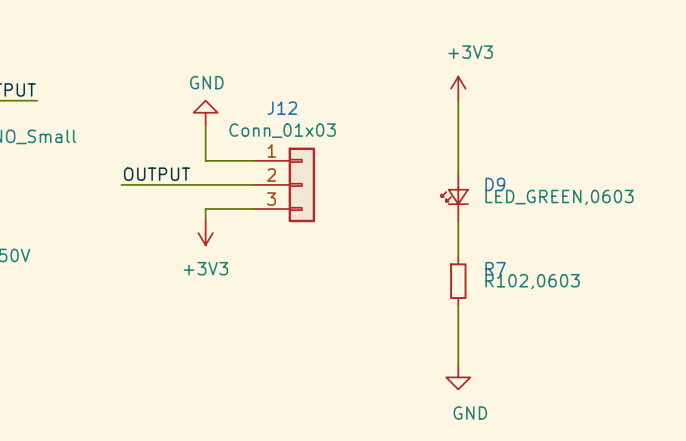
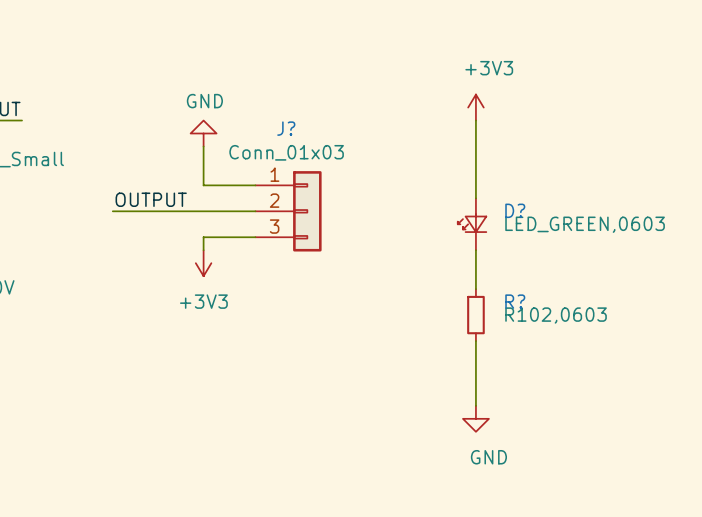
J12 name: J12 (282, 108) -> J? (286, 128)
D9 name: D9 (495, 184) -> D? (515, 210)
R7 name: R7 (495, 268) -> R? (515, 301)

